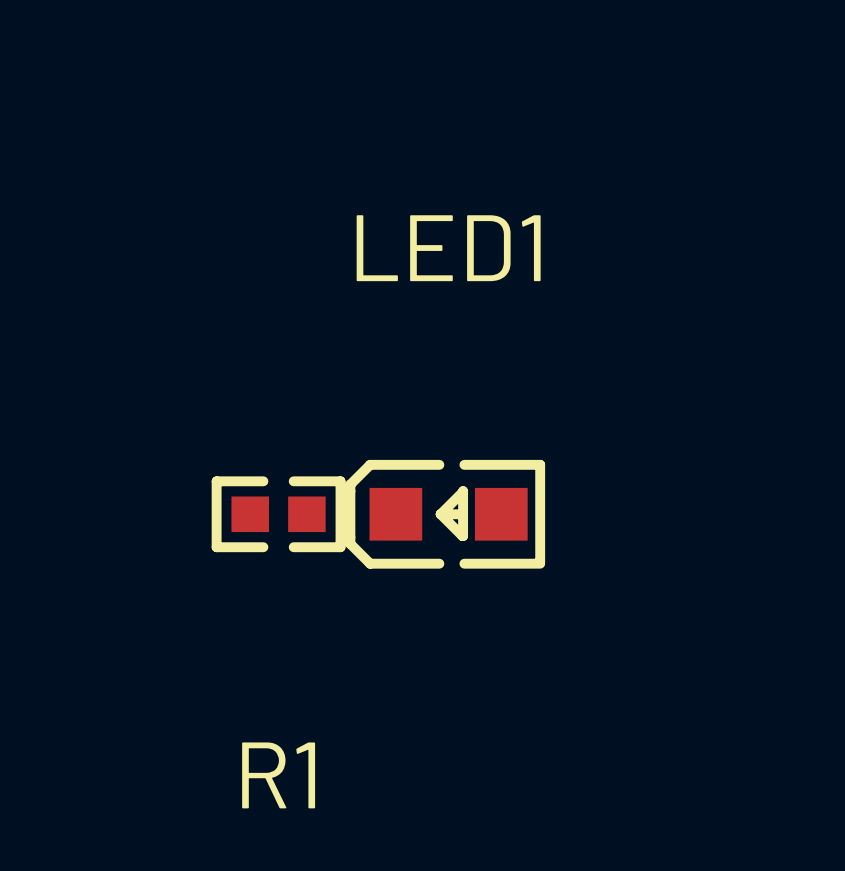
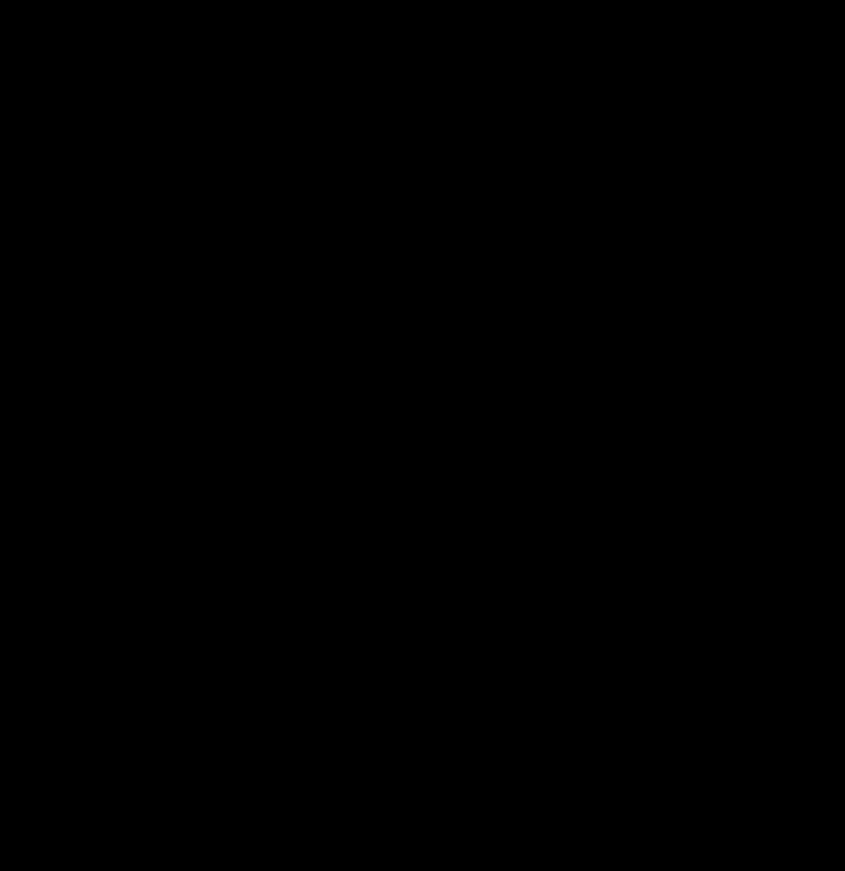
R1: (278, 514) -> none
LED1: (445, 514) -> none

